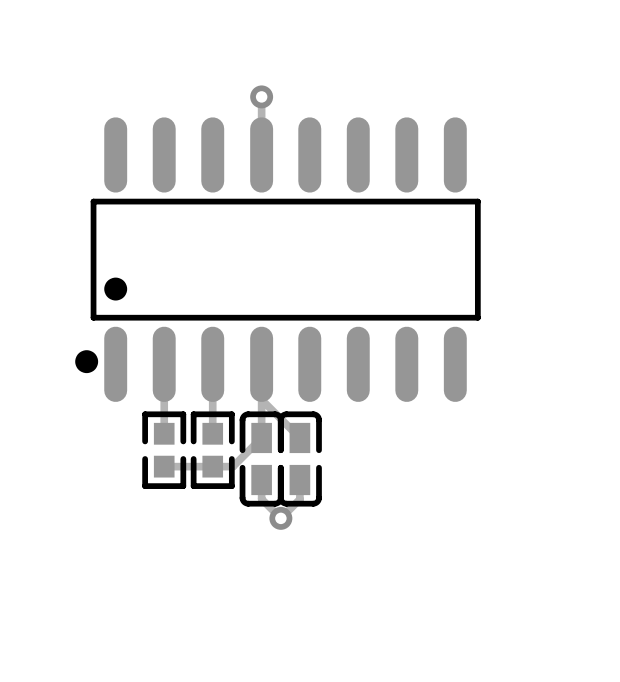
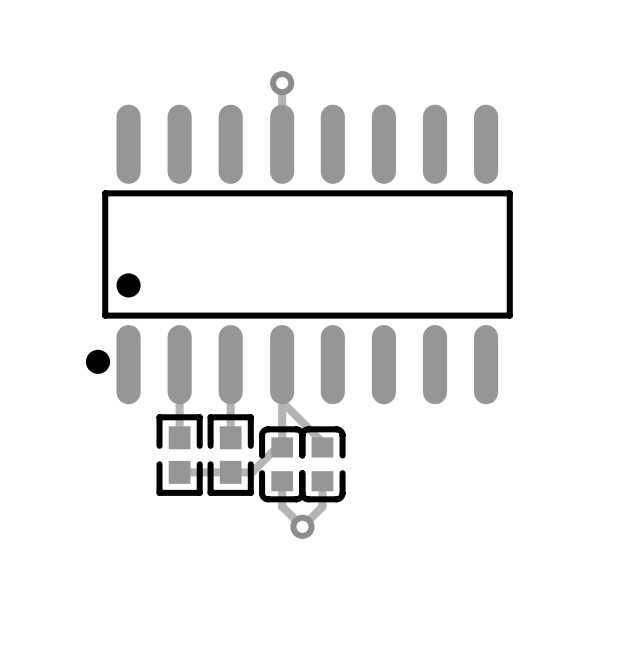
part footprint: [239, 411, 284, 507] -> [259, 426, 306, 503]
part footprint: [277, 411, 322, 507] -> [299, 426, 346, 503]

